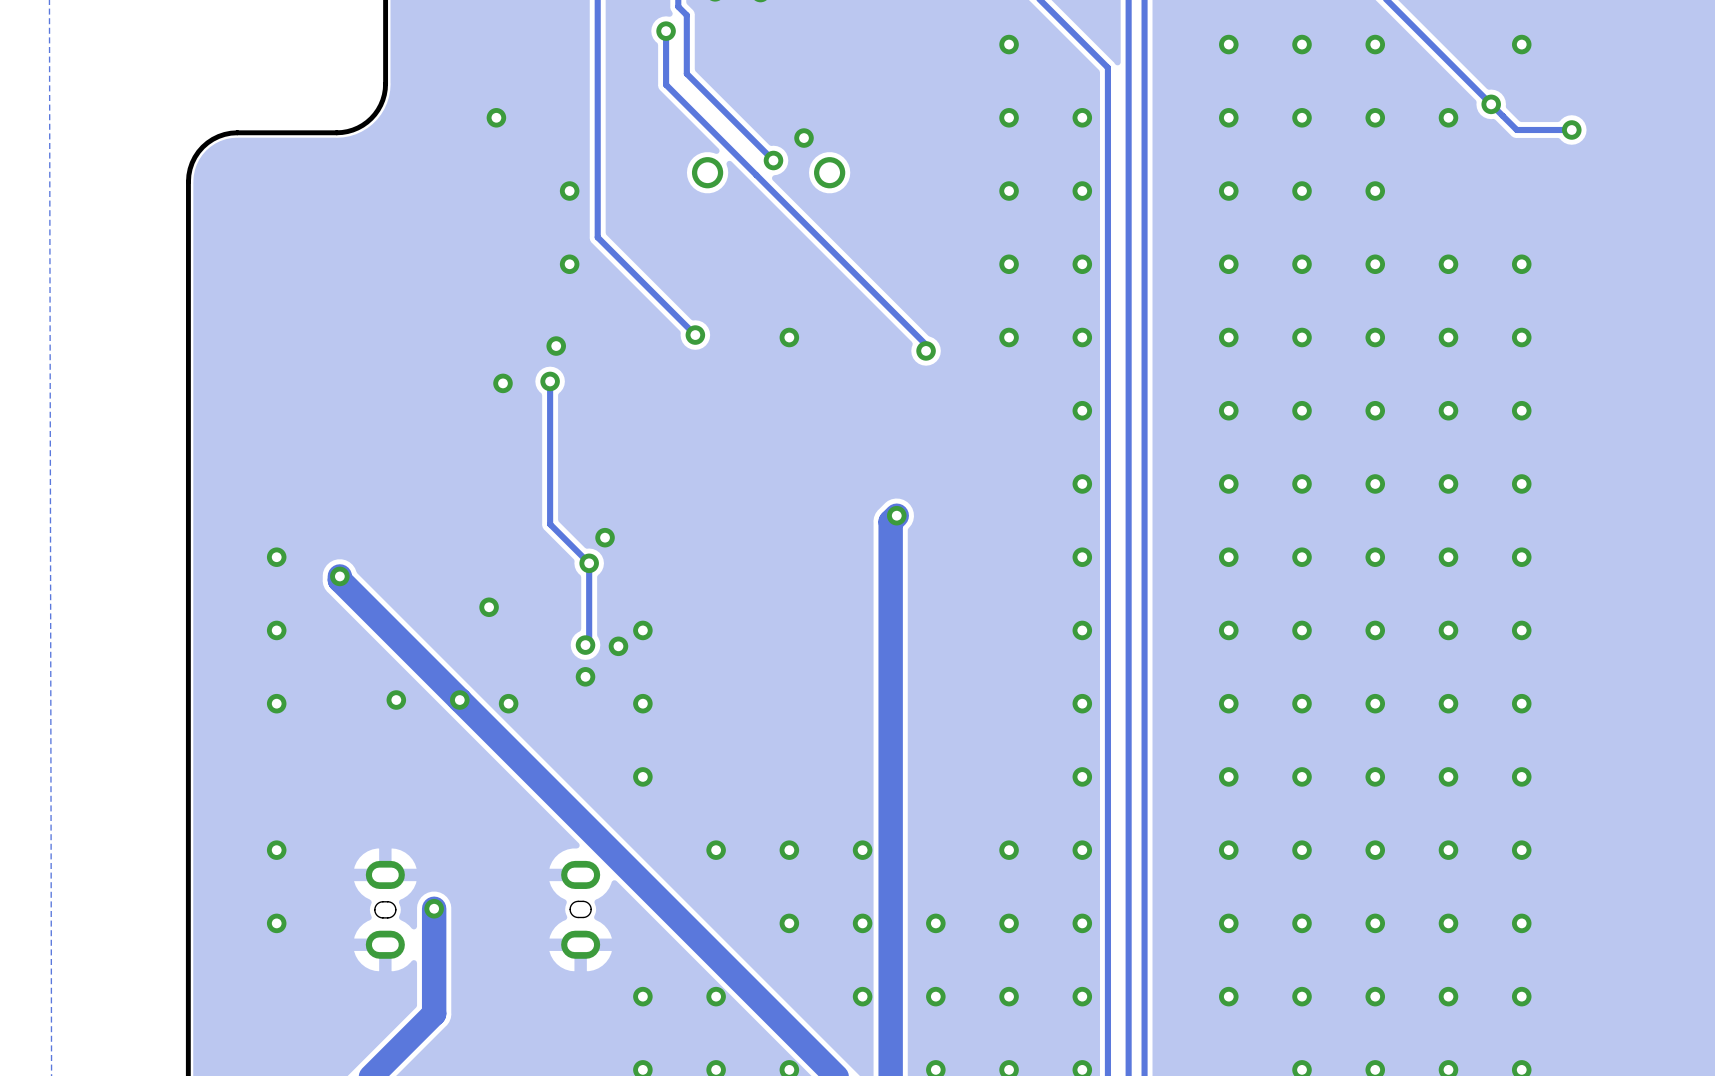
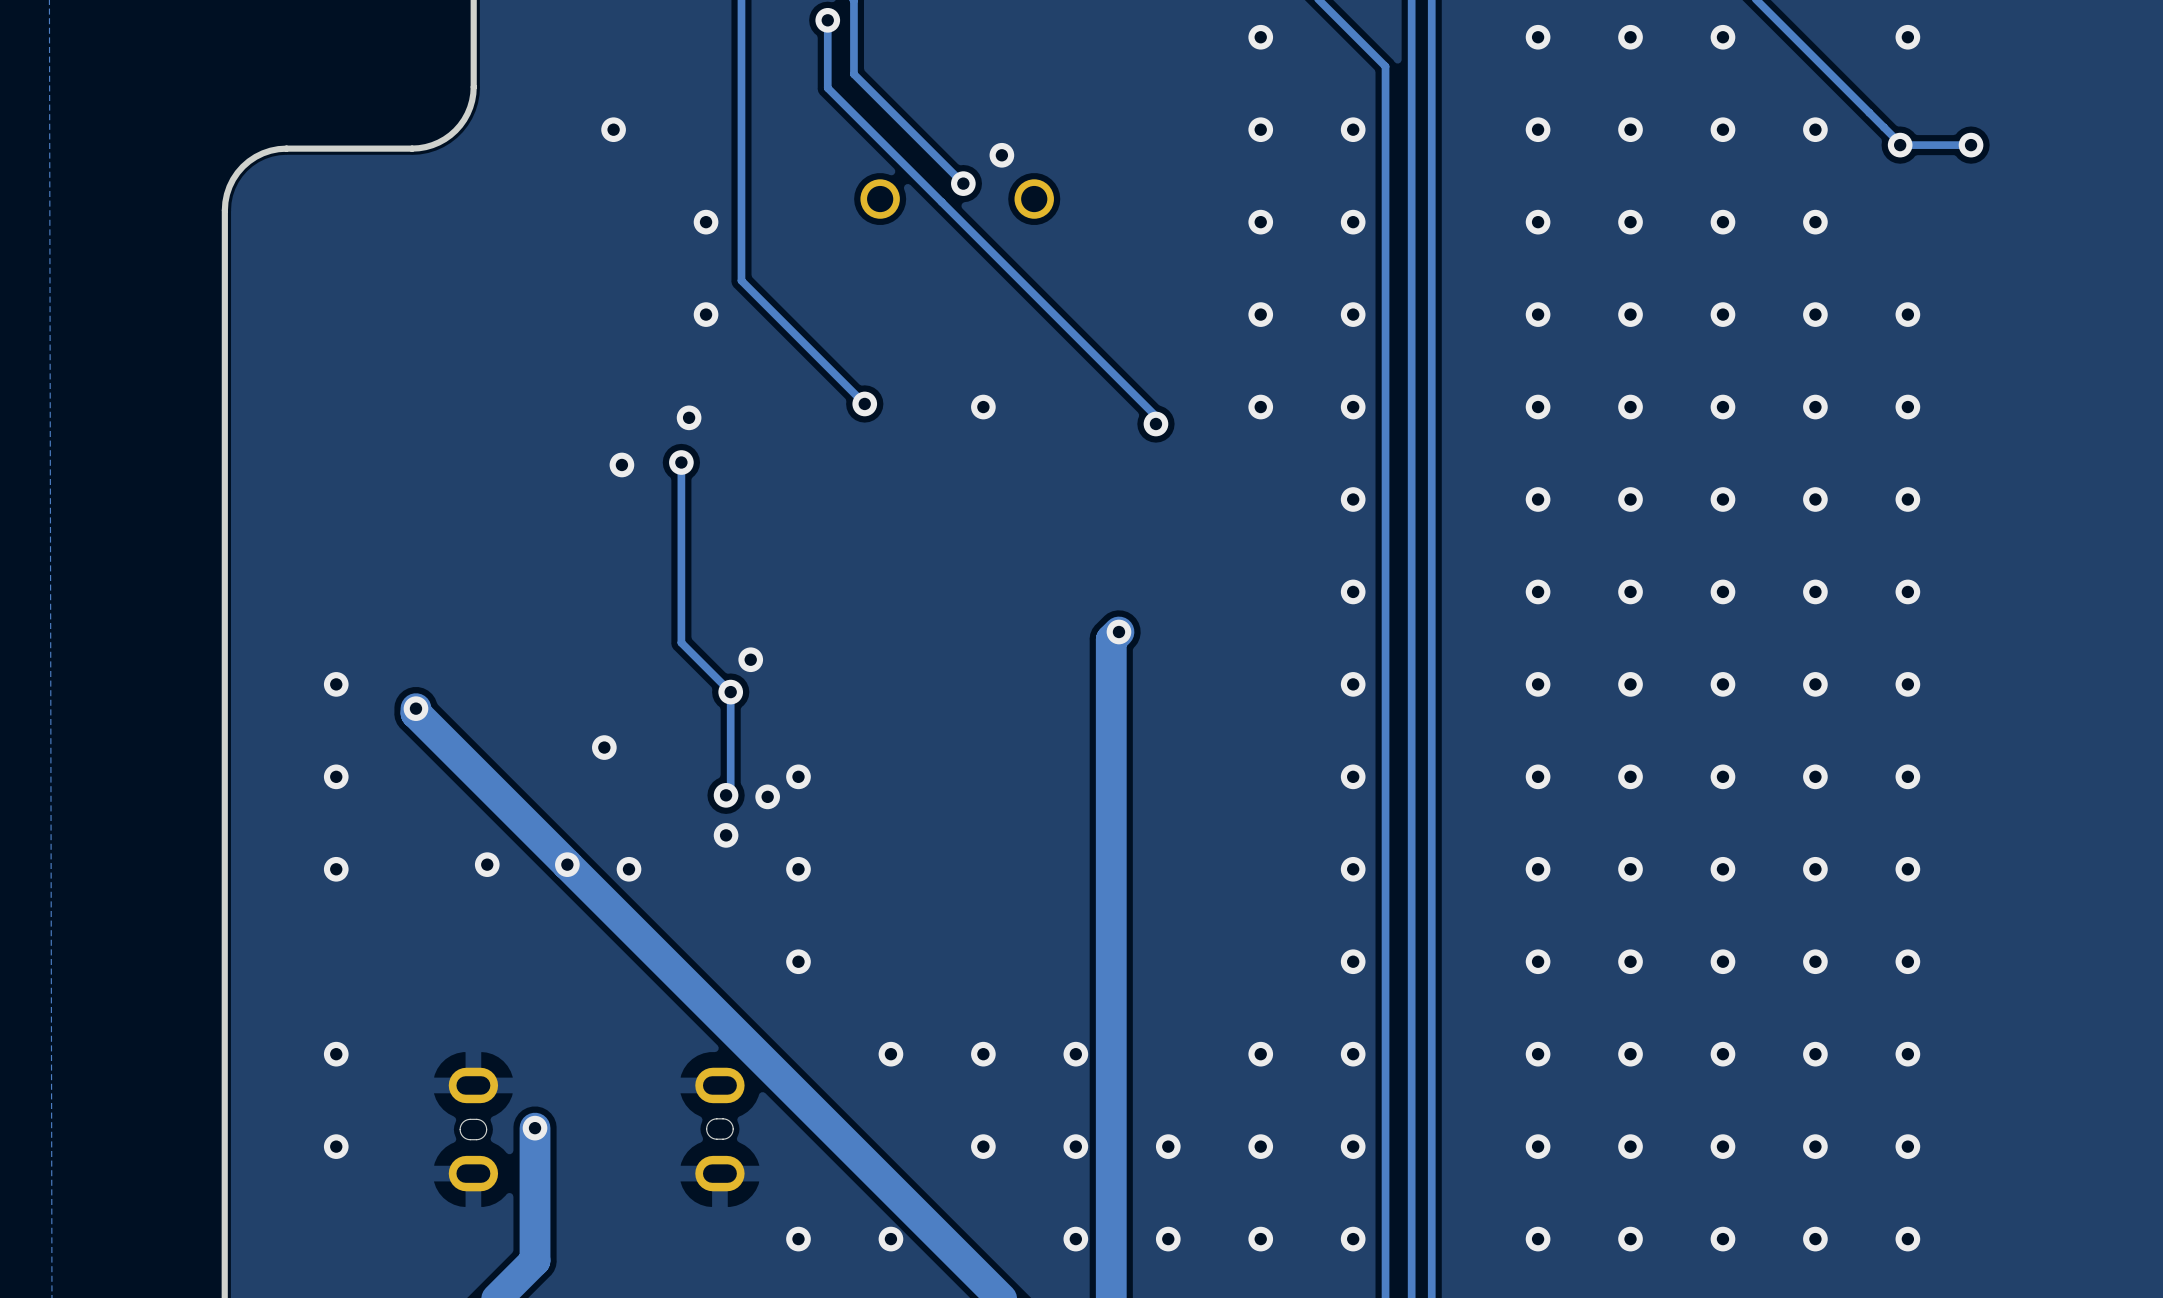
via position: (1491, 104) -> (1900, 145)
via: none -> (1815, 222)

